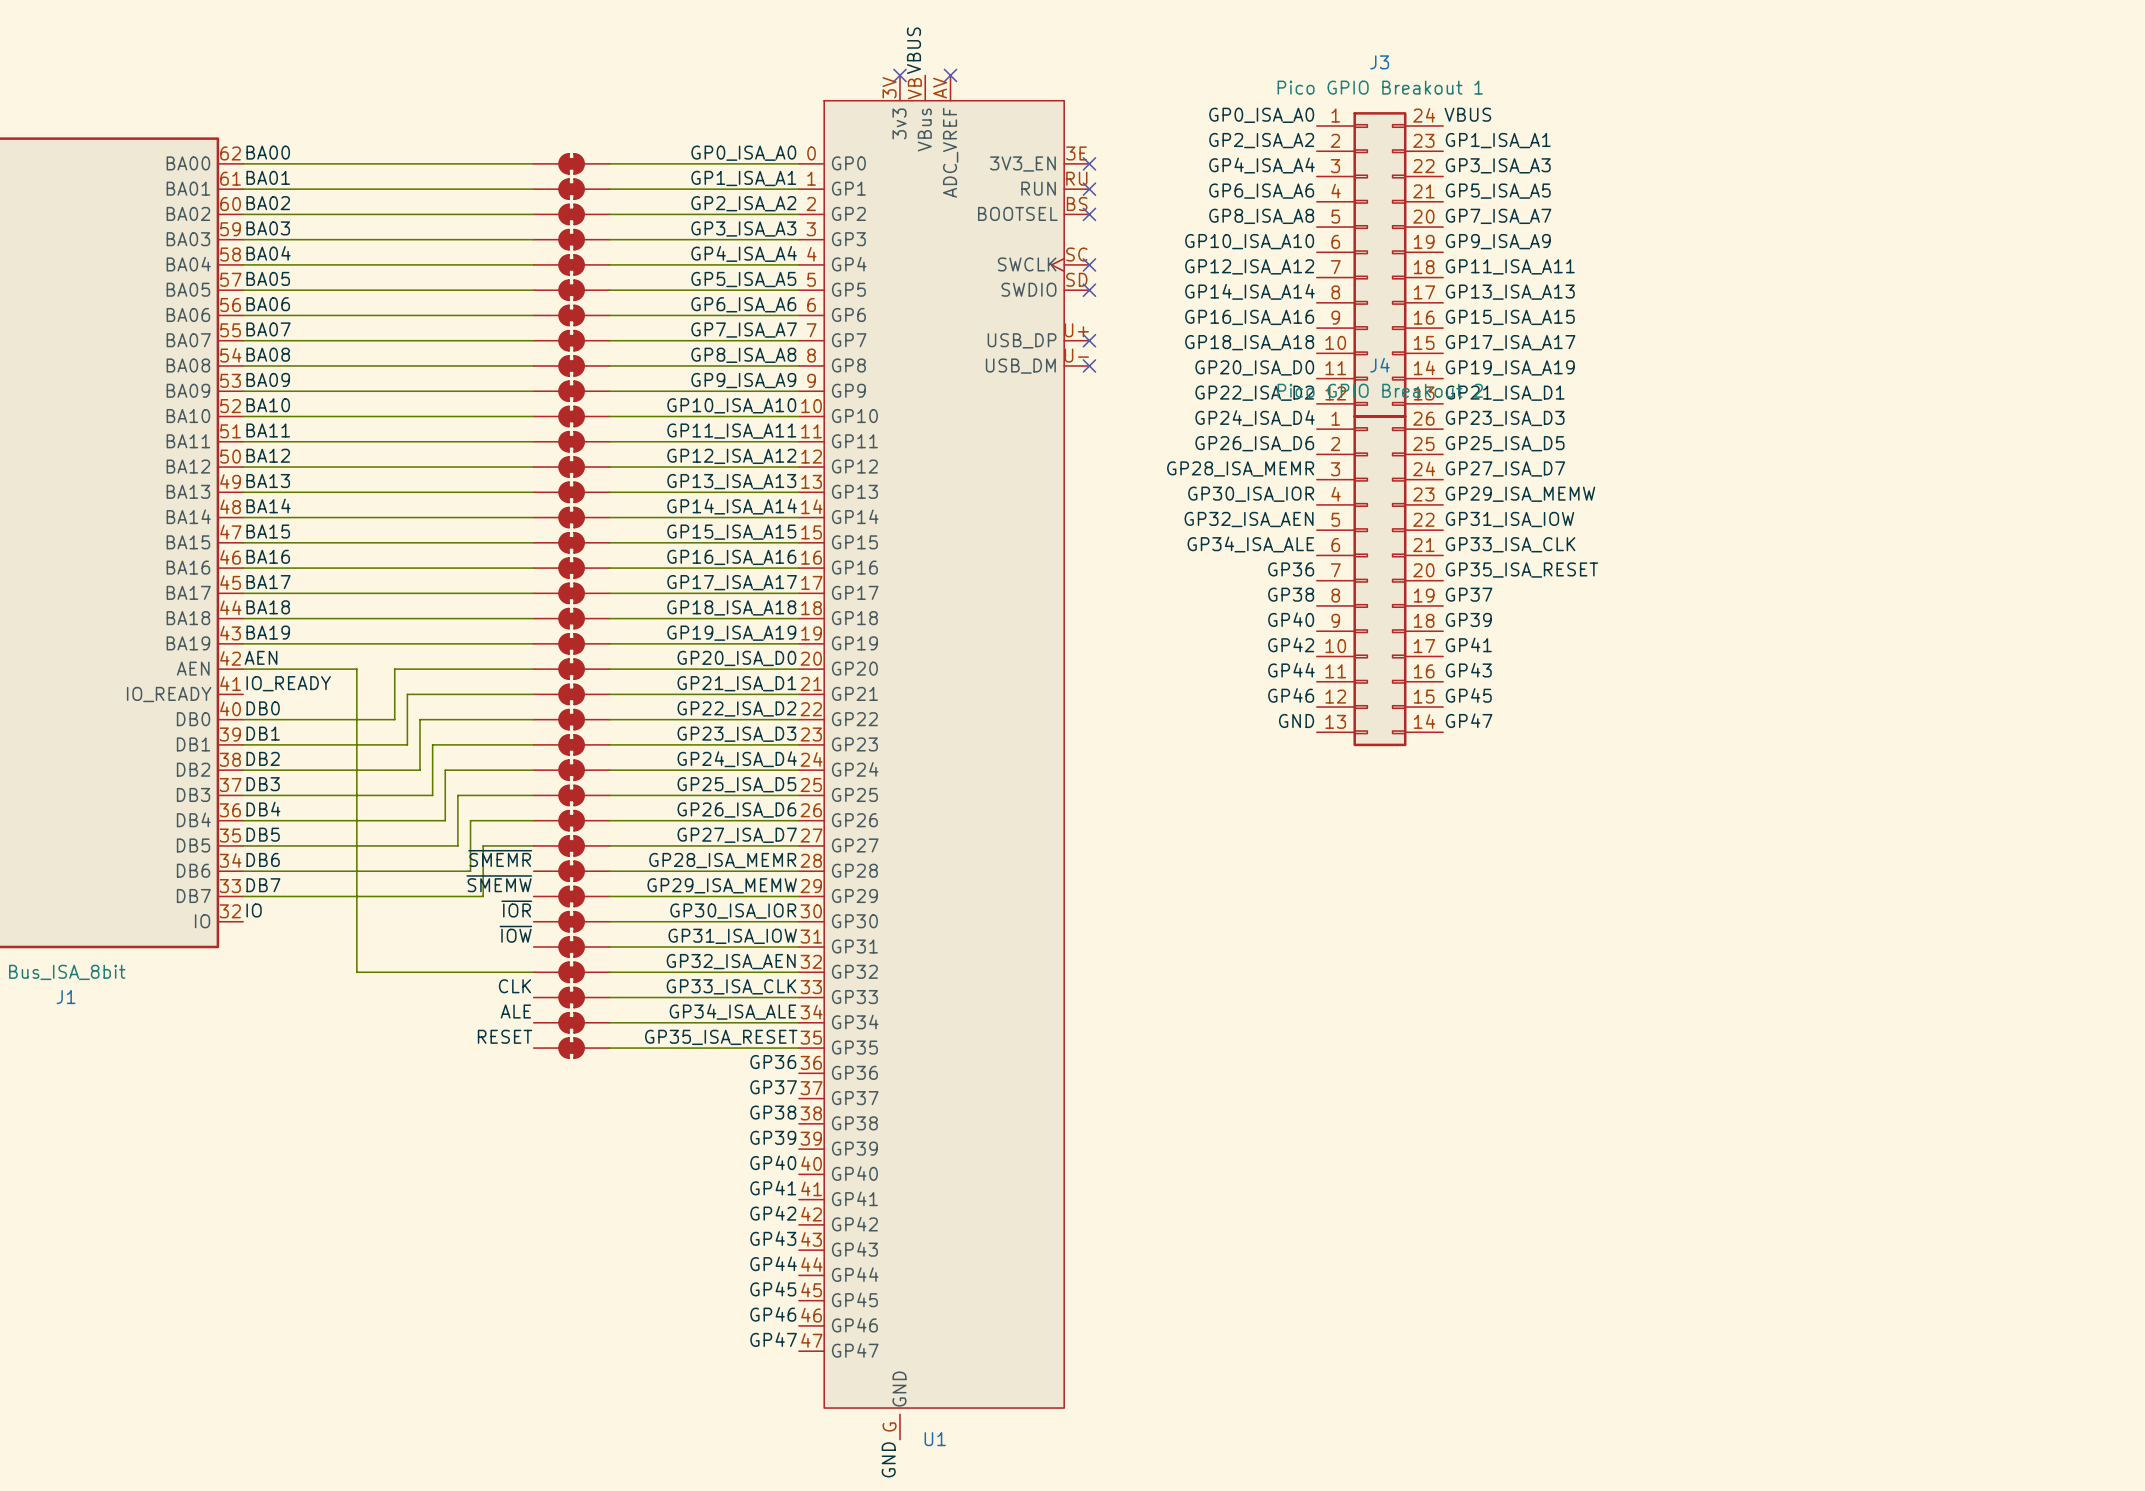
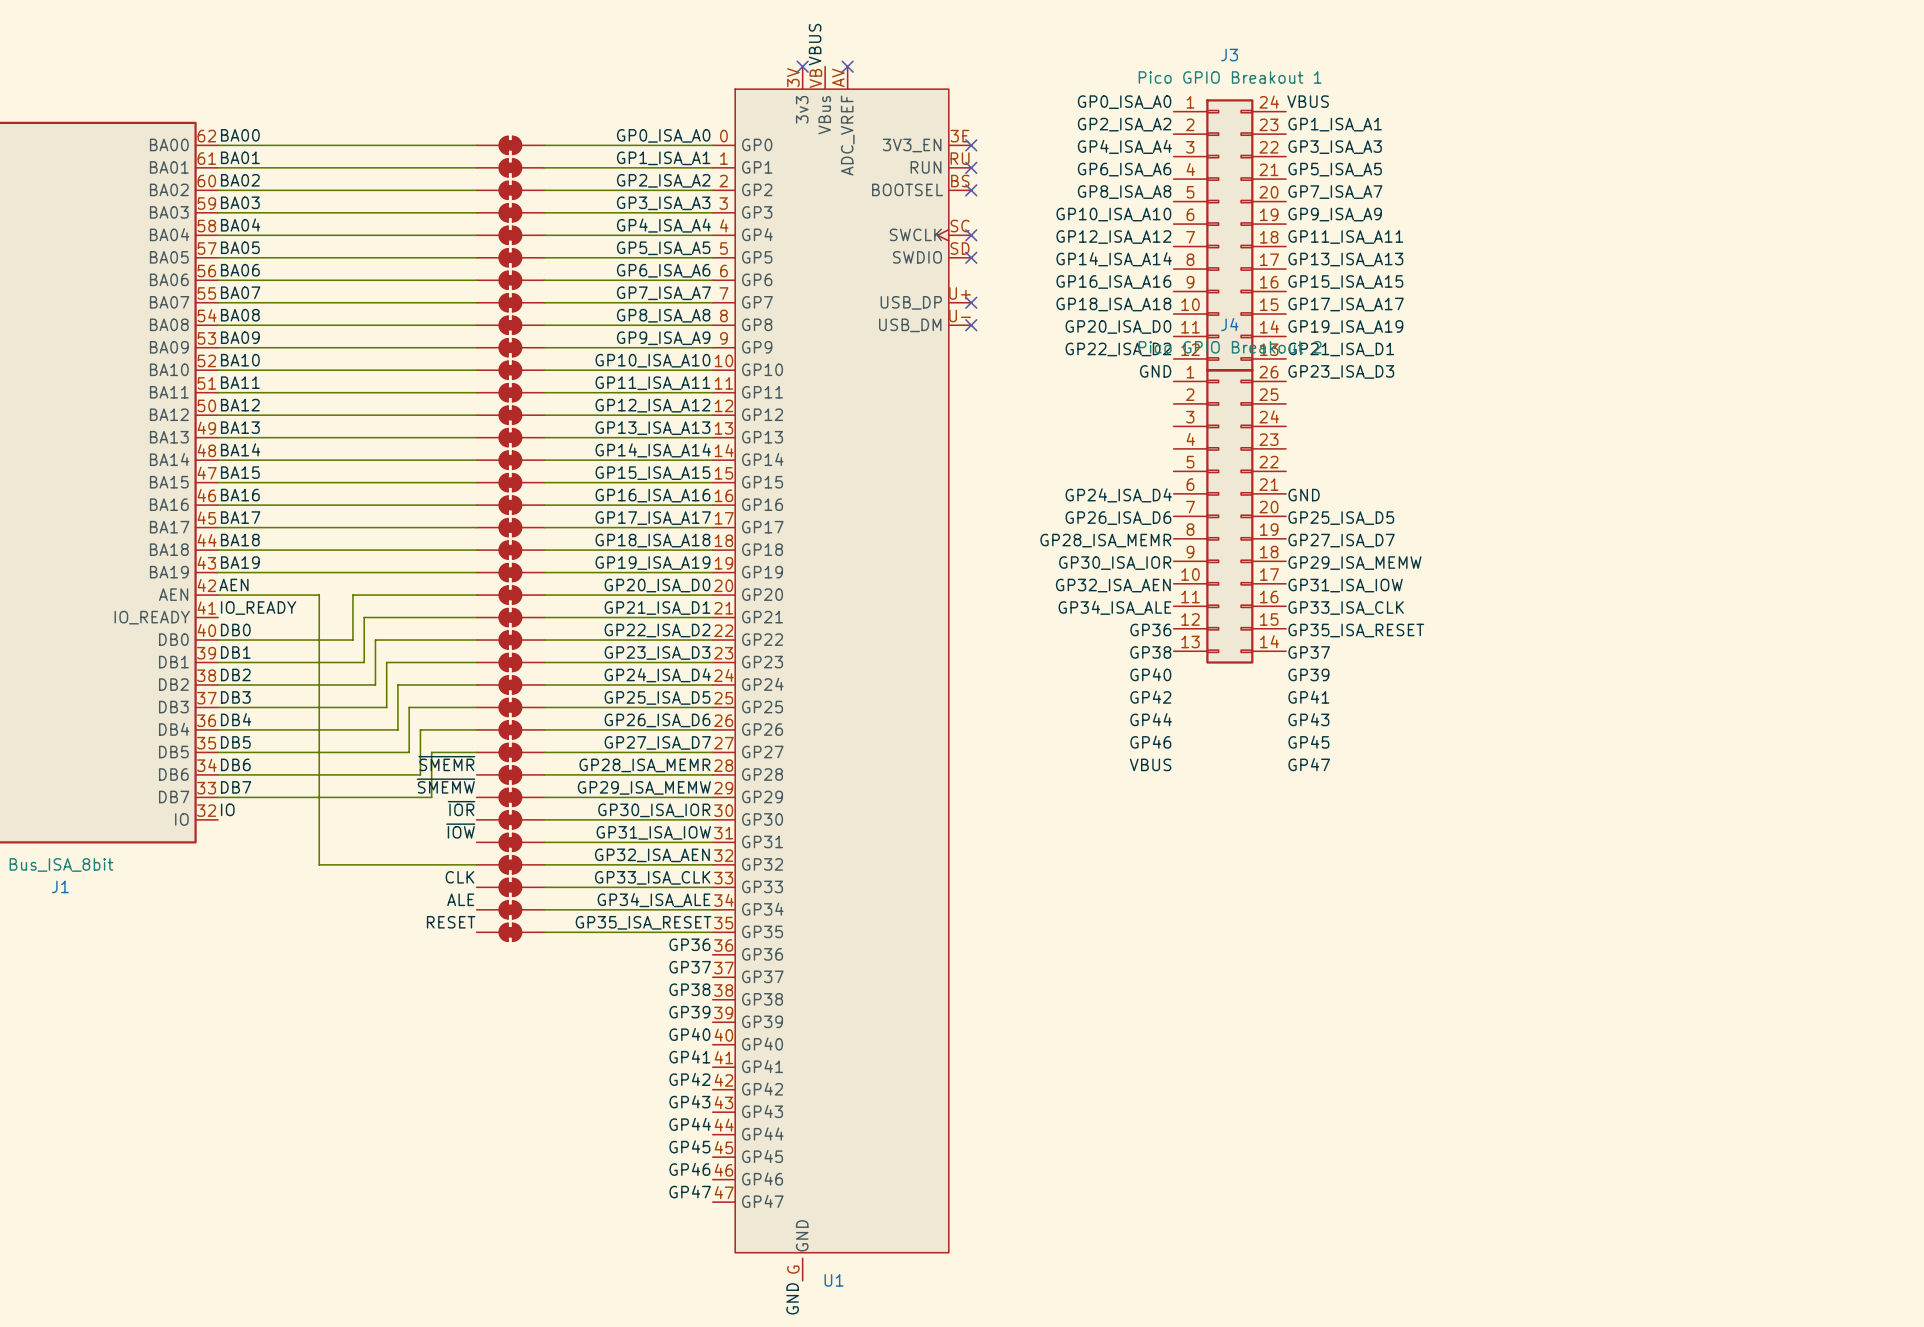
label: GP24_ISA_D4 (1255, 418) -> GND (1155, 371)
label position: GP26_ISA_D6 (1254, 443) -> GP26_ISA_D6 (1118, 518)
label position: GP25_ISA_D5 (1505, 443) -> GP25_ISA_D5 (1341, 518)
label position: GP28_ISA_MEMR (1240, 468) -> GP28_ISA_MEMR (1105, 540)
label position: GP27_ISA_D7 (1505, 468) -> GP27_ISA_D7 (1341, 540)
label position: GP30_ISA_IOR (1251, 494) -> GP30_ISA_IOR (1115, 563)
label position: GP29_ISA_MEMW (1520, 494) -> GP29_ISA_MEMW (1354, 563)
label position: GP32_ISA_AEN (1249, 519) -> GP32_ISA_AEN (1113, 585)
label position: GP31_ISA_IOW (1509, 519) -> GP31_ISA_IOW (1345, 585)
label position: GP34_ISA_ALE (1250, 544) -> GP34_ISA_ALE (1114, 607)
label position: GP33_ISA_CLK (1510, 544) -> GP33_ISA_CLK (1346, 608)
label: none -> GP24_ISA_D4 (1118, 495)
label position: GP36 (1291, 569) -> GP36 (1150, 629)
label position: GP35_ISA_RESET (1522, 570) -> GP35_ISA_RESET (1356, 630)
label position: GP38 (1291, 594) -> GP38 (1150, 652)
label position: GP37 (1469, 594) -> GP37 (1309, 652)
label position: GP40 (1291, 619) -> GP40 (1150, 674)
label position: GP39 (1468, 619) -> GP39 (1308, 674)
label position: GP42 (1291, 644) -> GP42 (1150, 697)
label position: GP41 (1468, 644) -> GP41 (1308, 697)
label position: GP44 (1291, 670) -> GP44 (1151, 719)
label position: GP43 (1468, 670) -> GP43 (1308, 719)
label position: GP46 (1291, 695) -> GP46 (1150, 742)
label position: GP45 (1468, 695) -> GP45 (1308, 742)
label position: GP47 (1469, 720) -> GP47 (1309, 764)
label position: GND (1296, 721) -> GND (1304, 495)
label: none -> VBUS (1150, 764)

